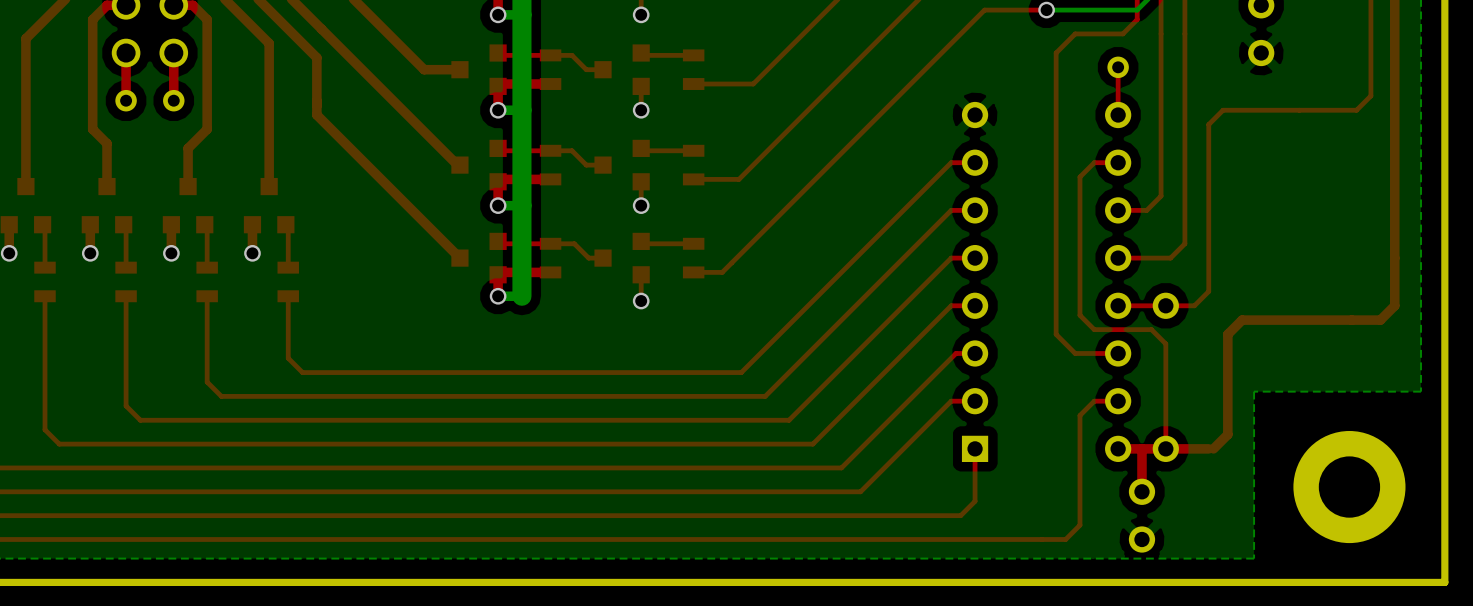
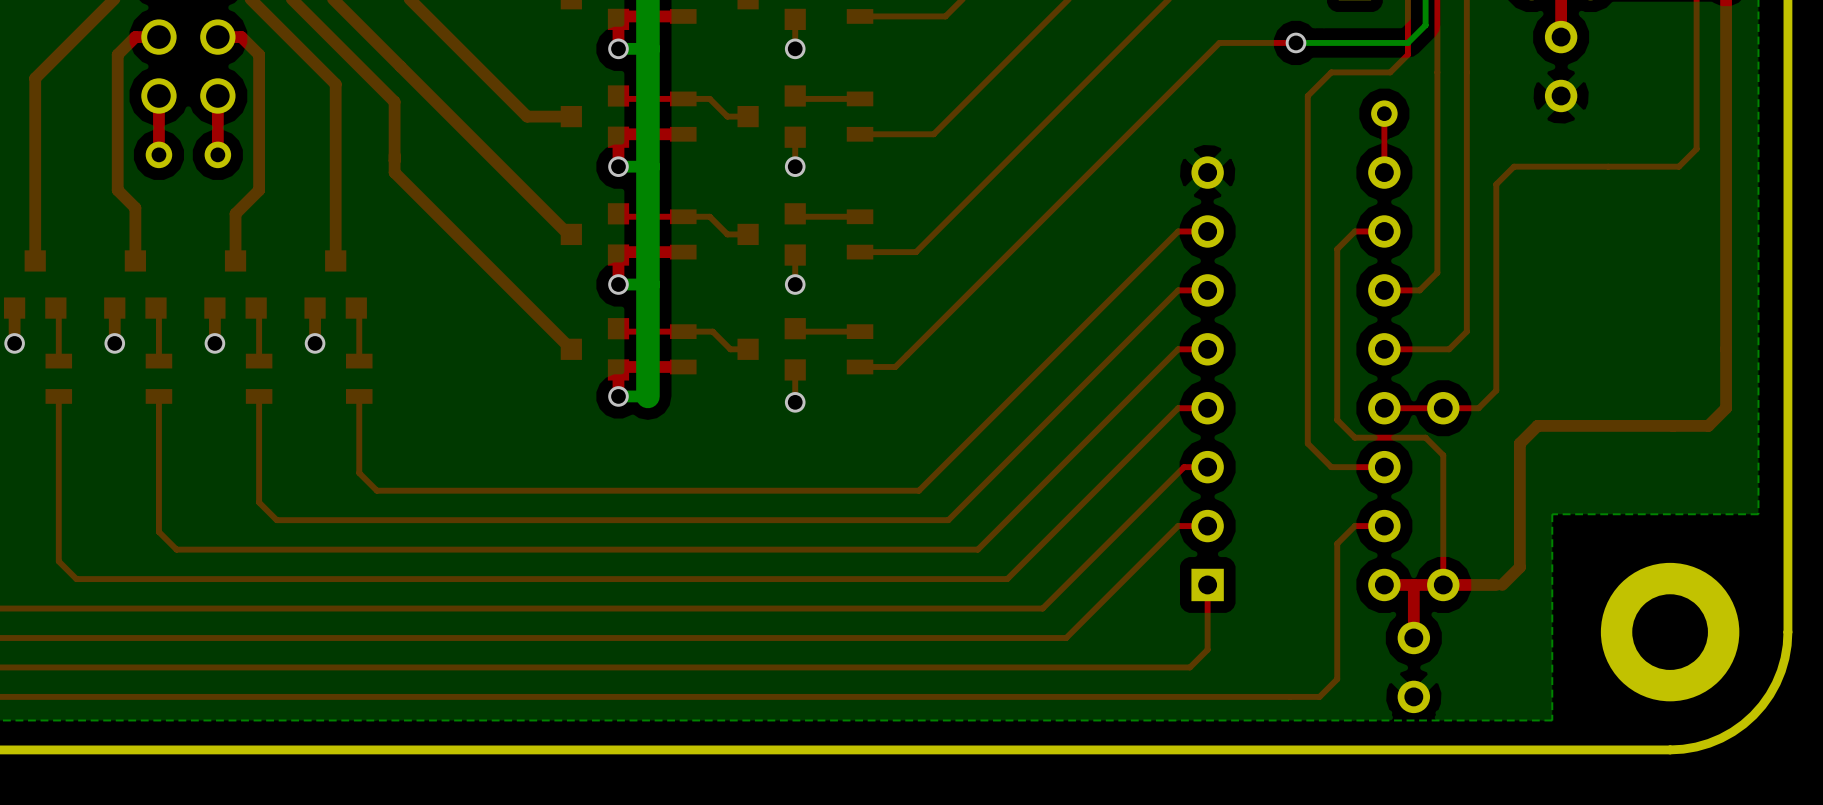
board edge: (1444, 487) (1444, 582) (1349, 582) -> (1787, 632) (1781, 671) (1769, 694) (1753, 715) (1721, 738) (1696, 746) (1670, 749)

